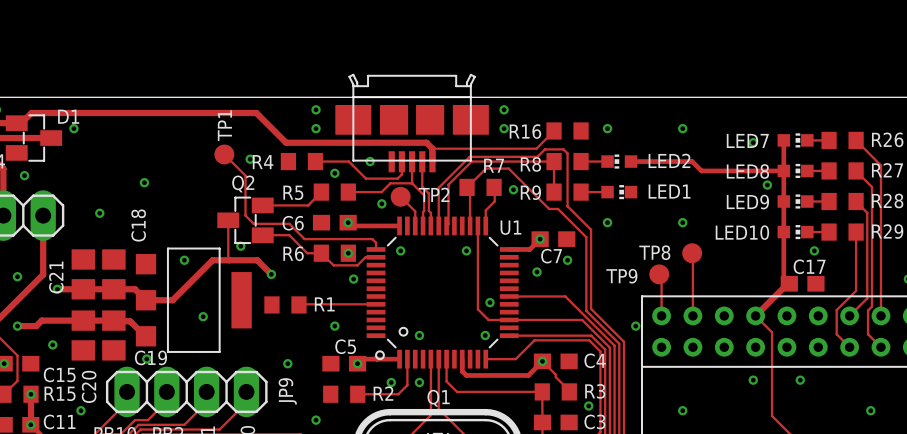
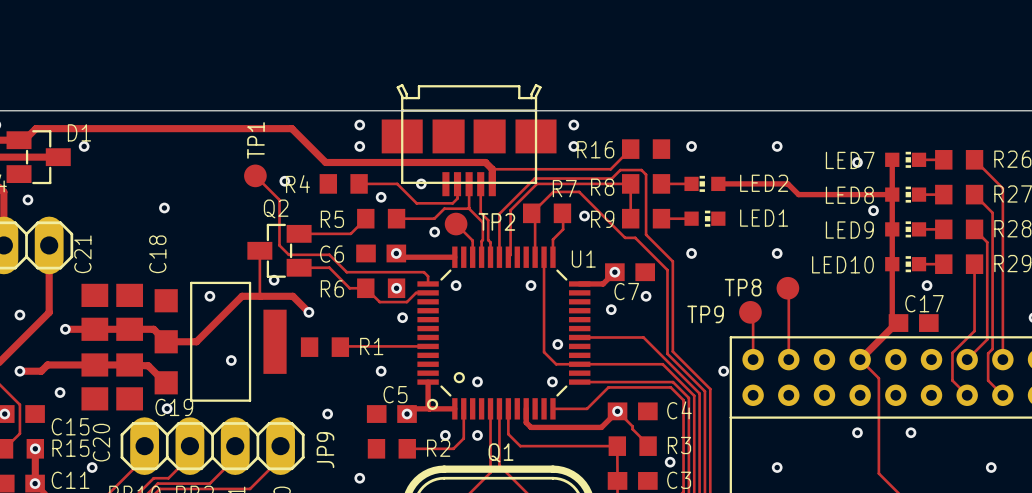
via: (99, 213) -> none
C21 name position: C21 (56, 277) -> C21 (82, 254)
track: none -> (428, 382) (428, 407)

